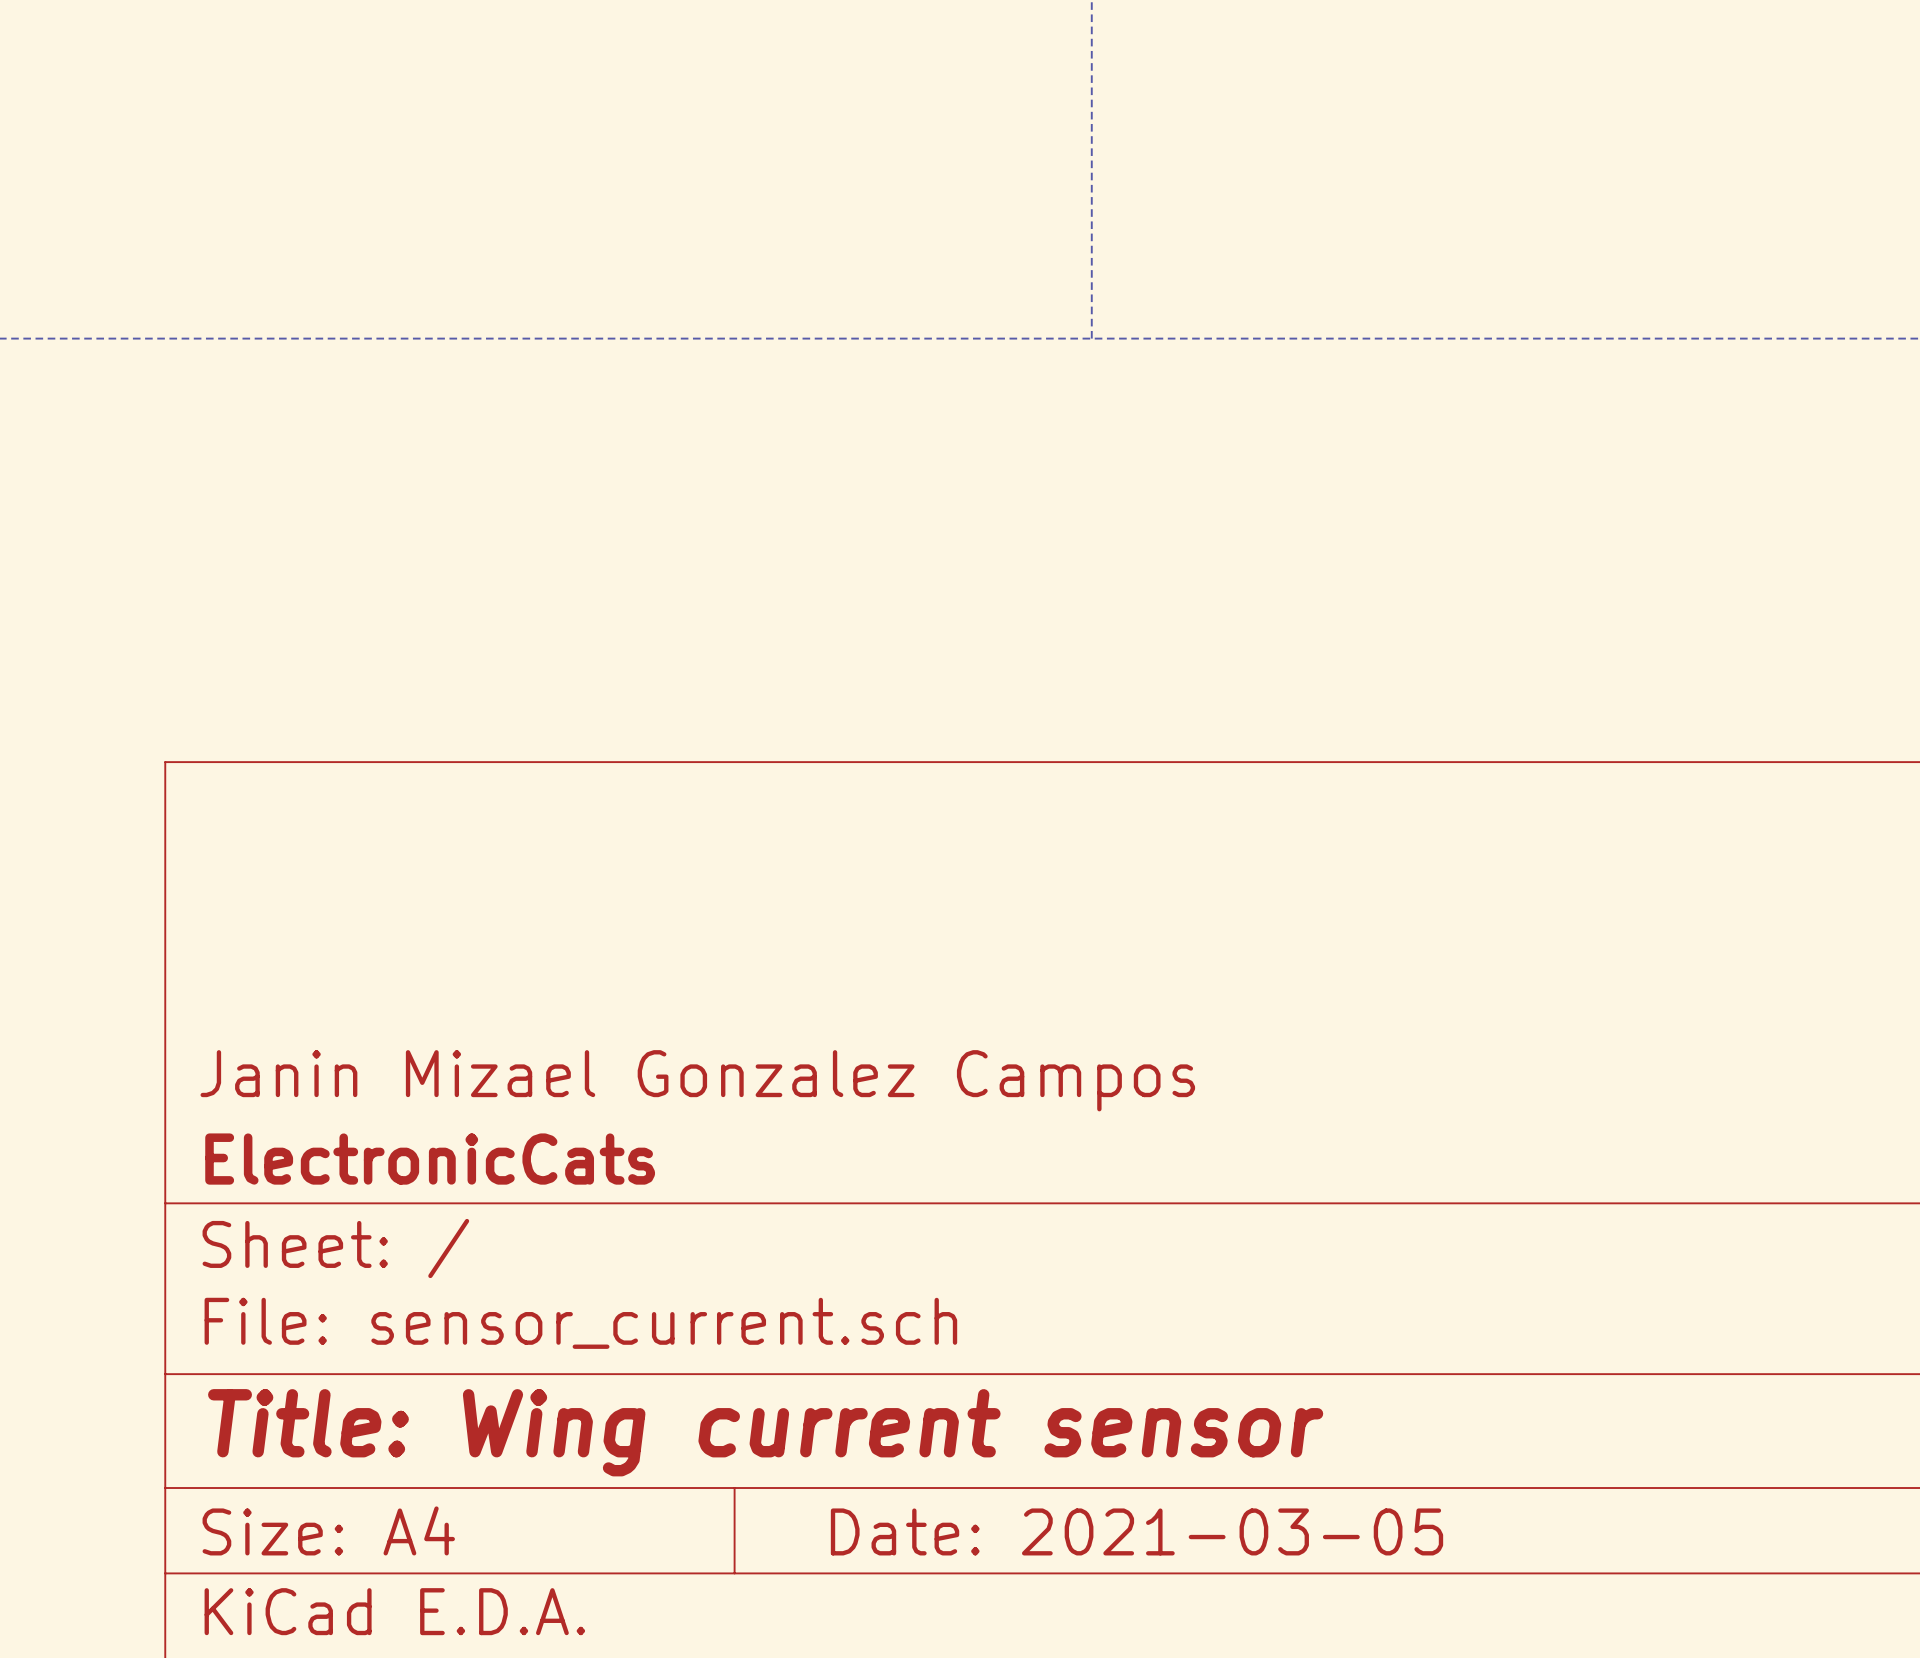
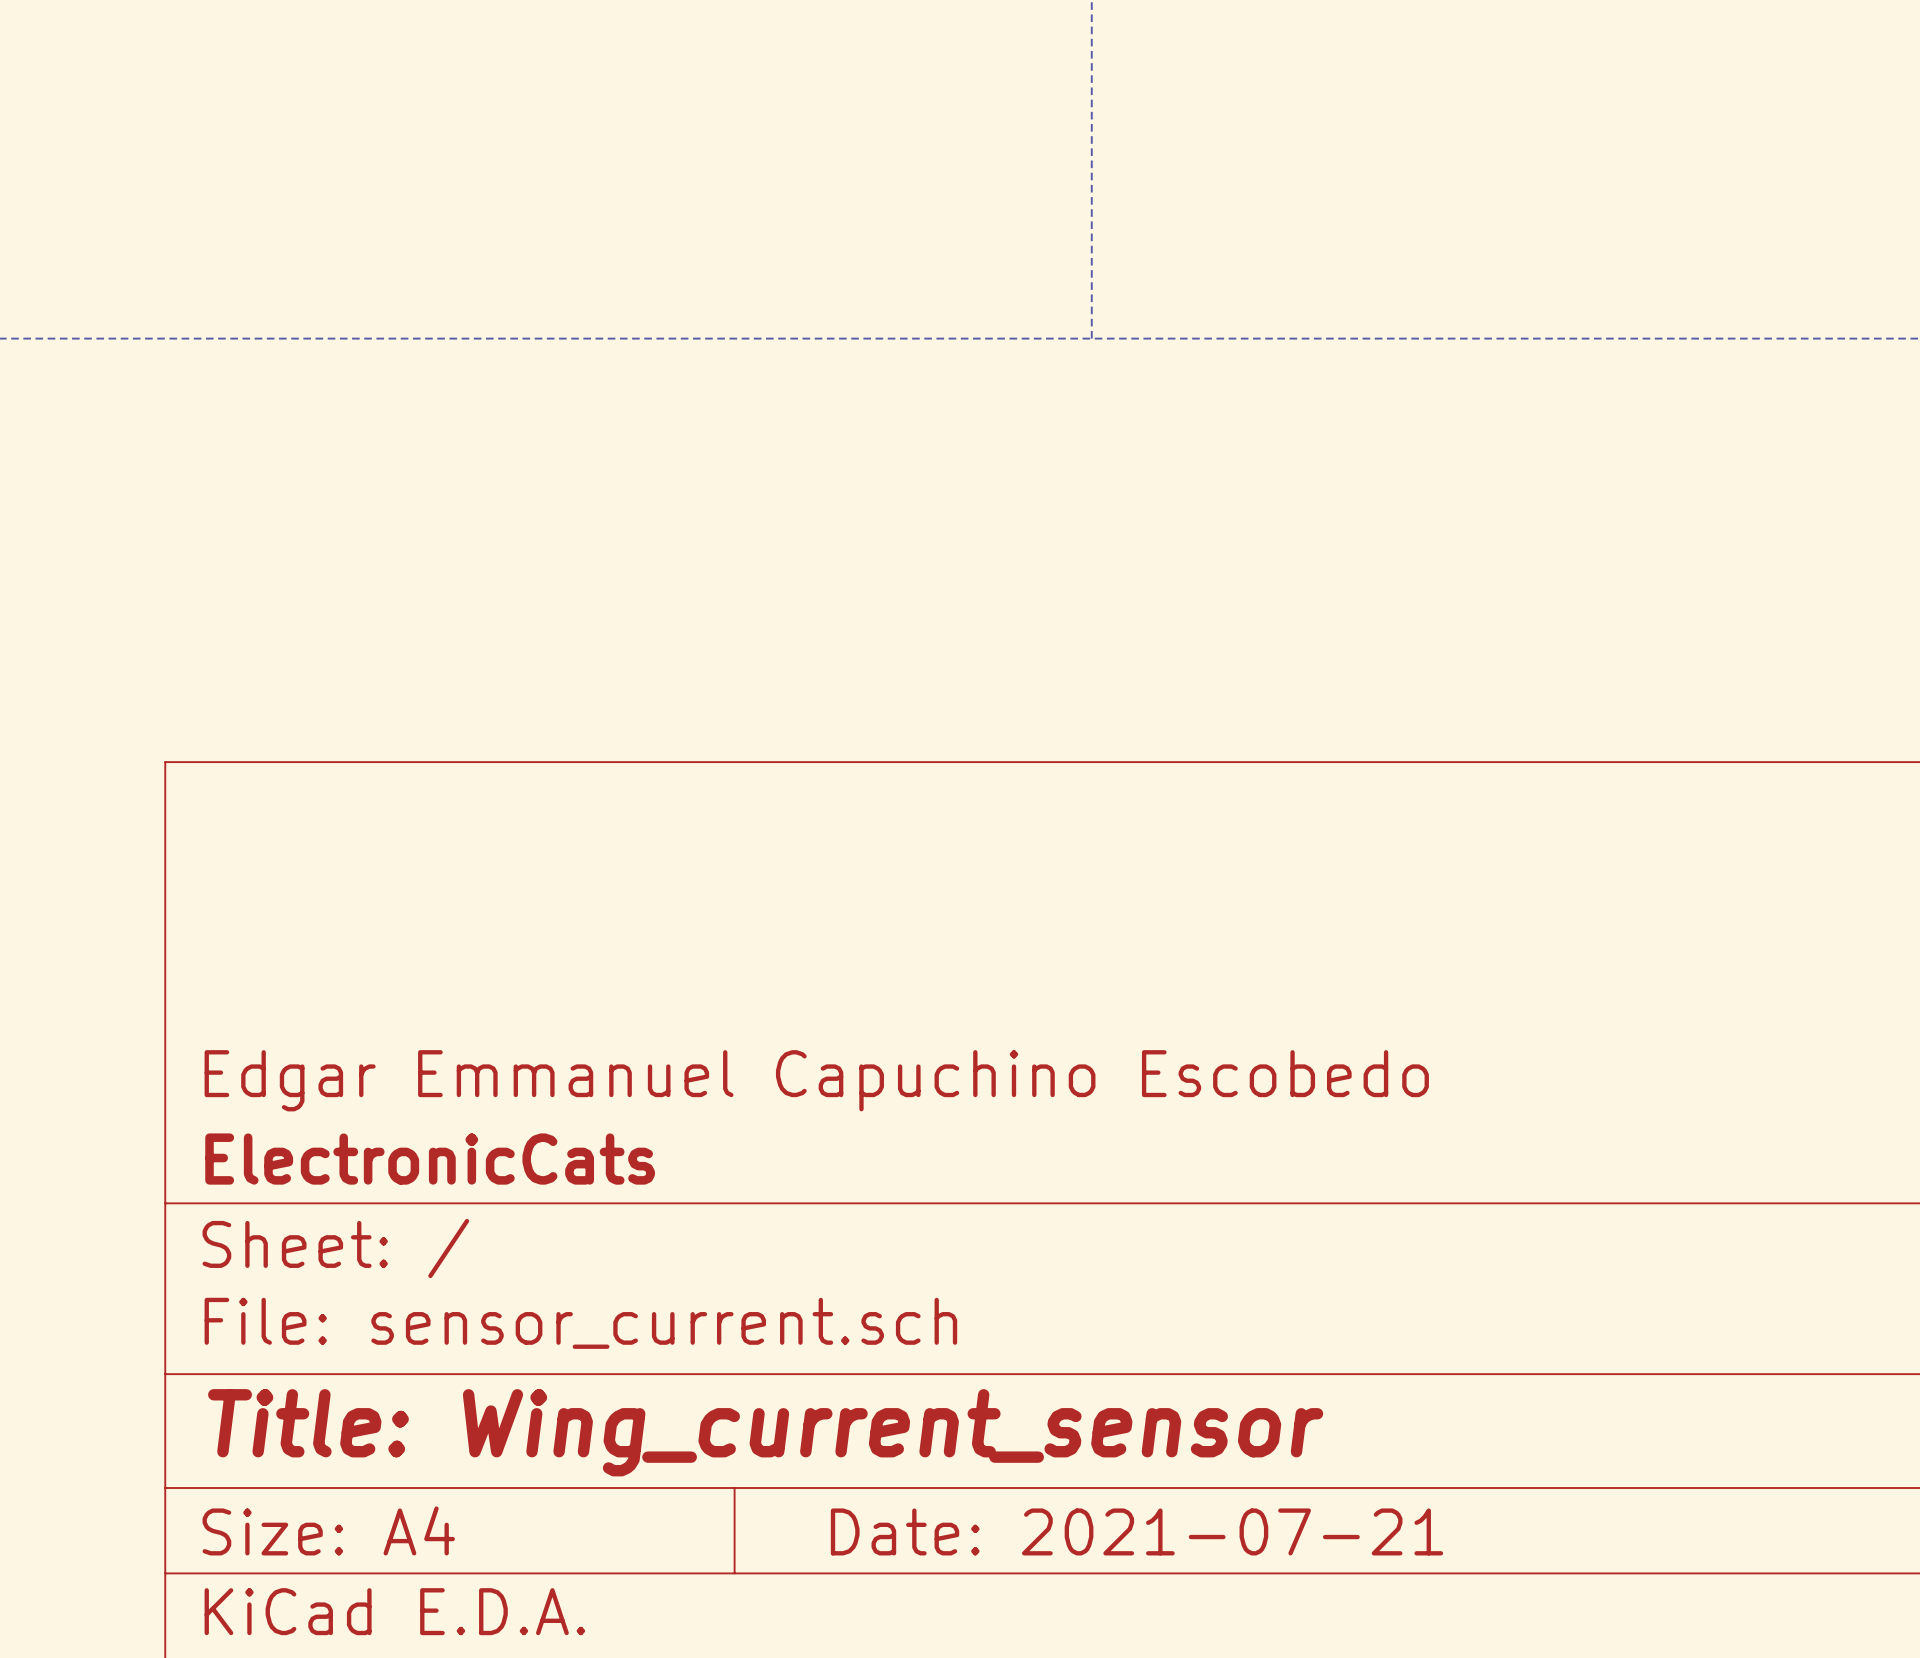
title block: Janin Mizael Gonzalez Campos (697, 1080) -> Edgar Emmanuel Capuchino Escobedo (816, 1080)
title block: Title: Wing current sensor (765, 1432) -> Title: Wing_current_sensor (765, 1432)
title block: Date: 2021-03-05 (1136, 1531) -> Date: 2021-07-21 (1136, 1531)

